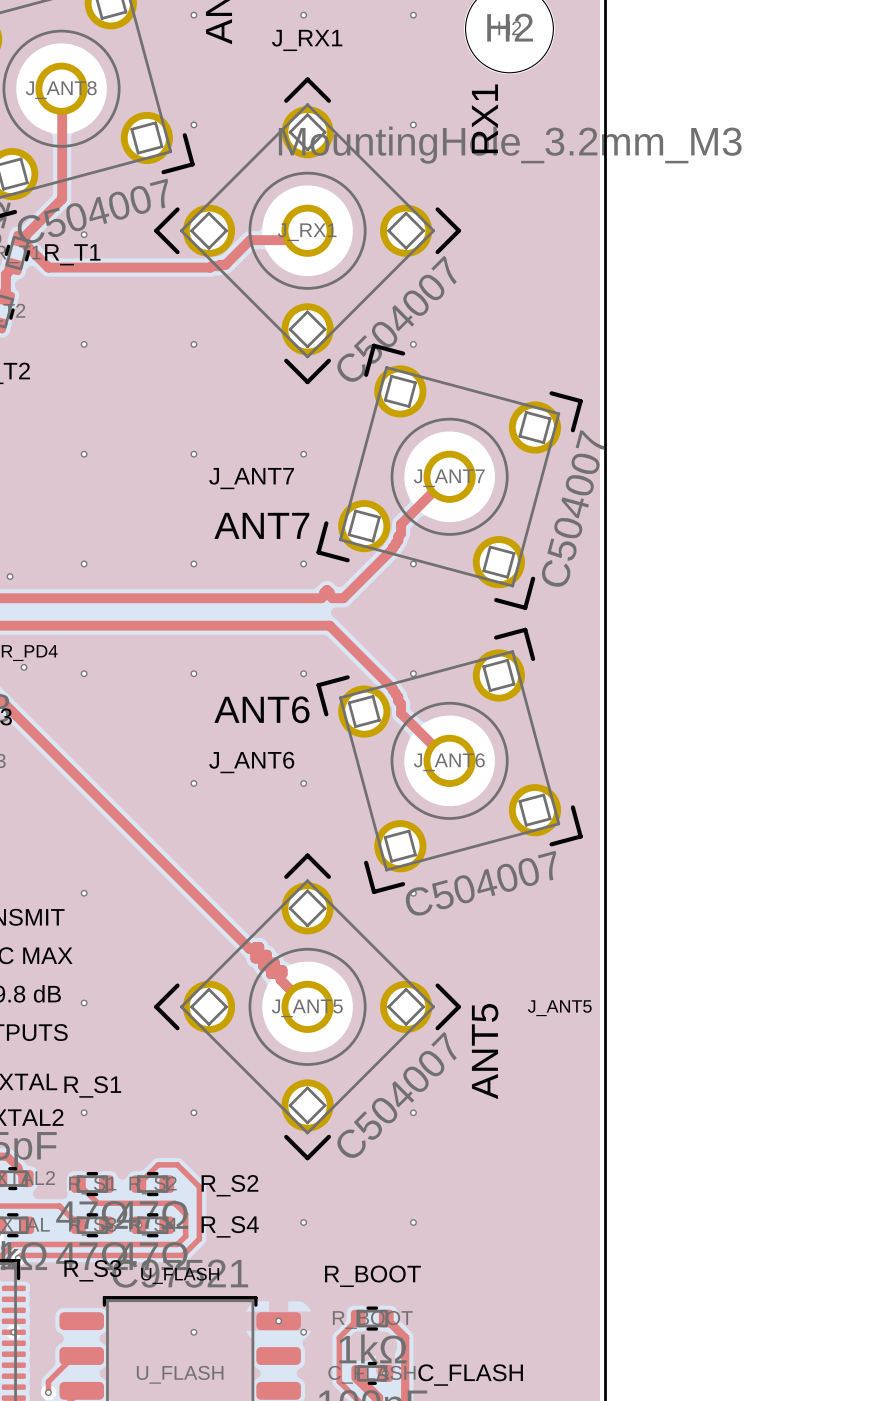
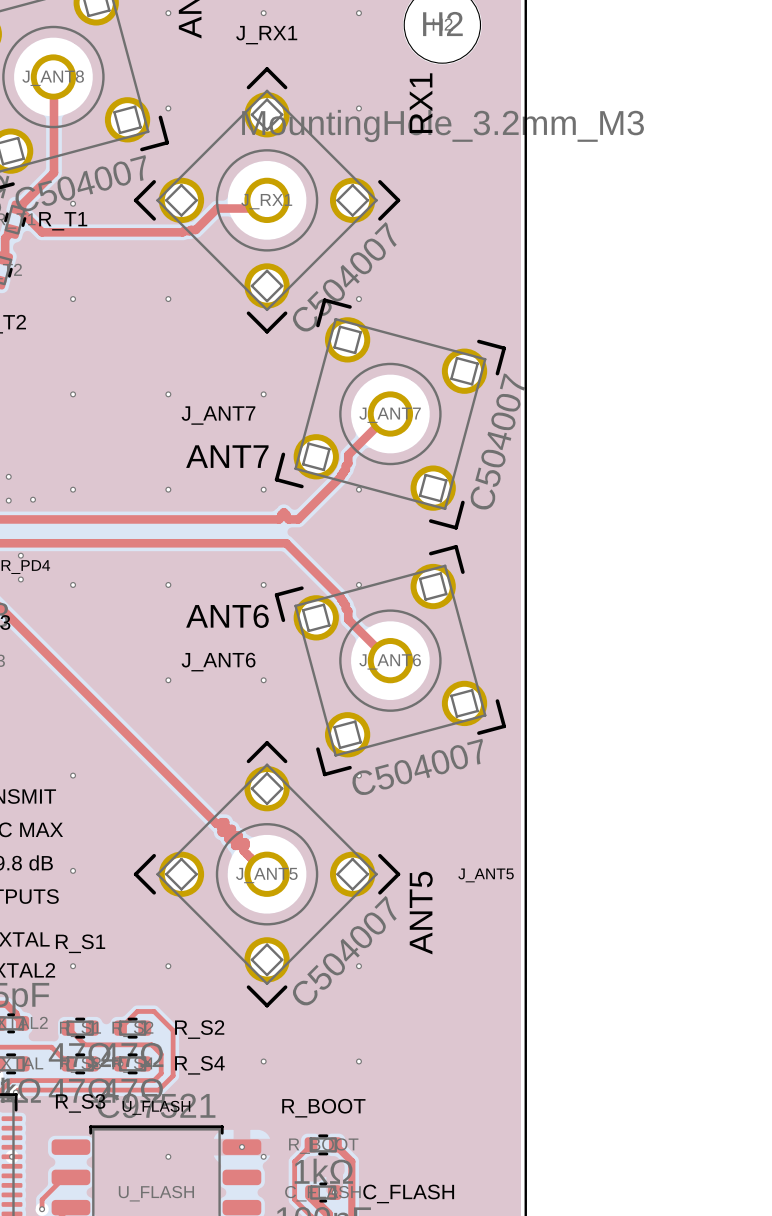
via: none -> (8, 476)
via: none -> (33, 499)
via: none -> (20, 555)

